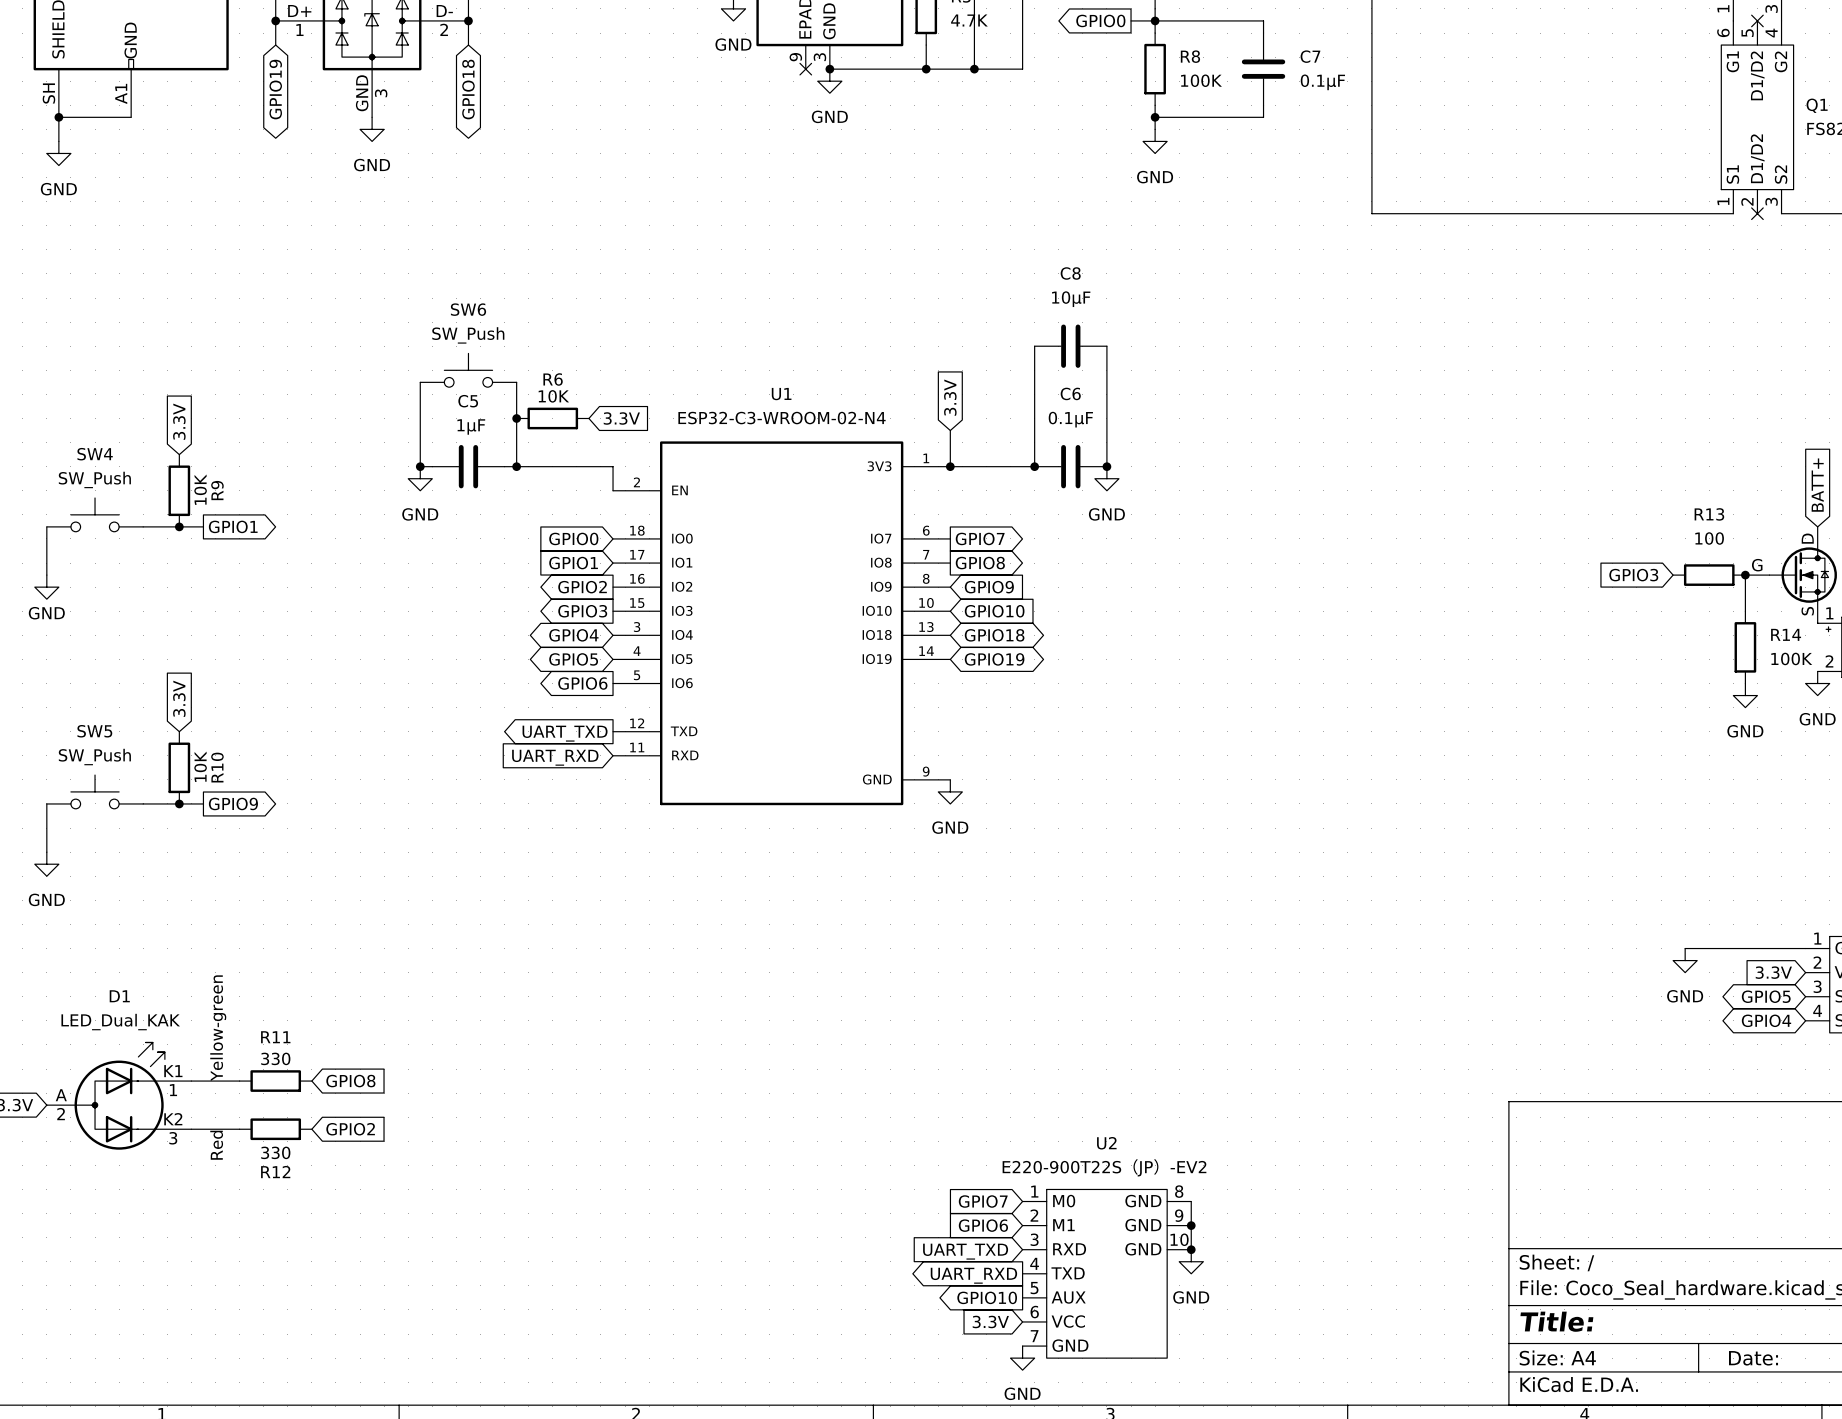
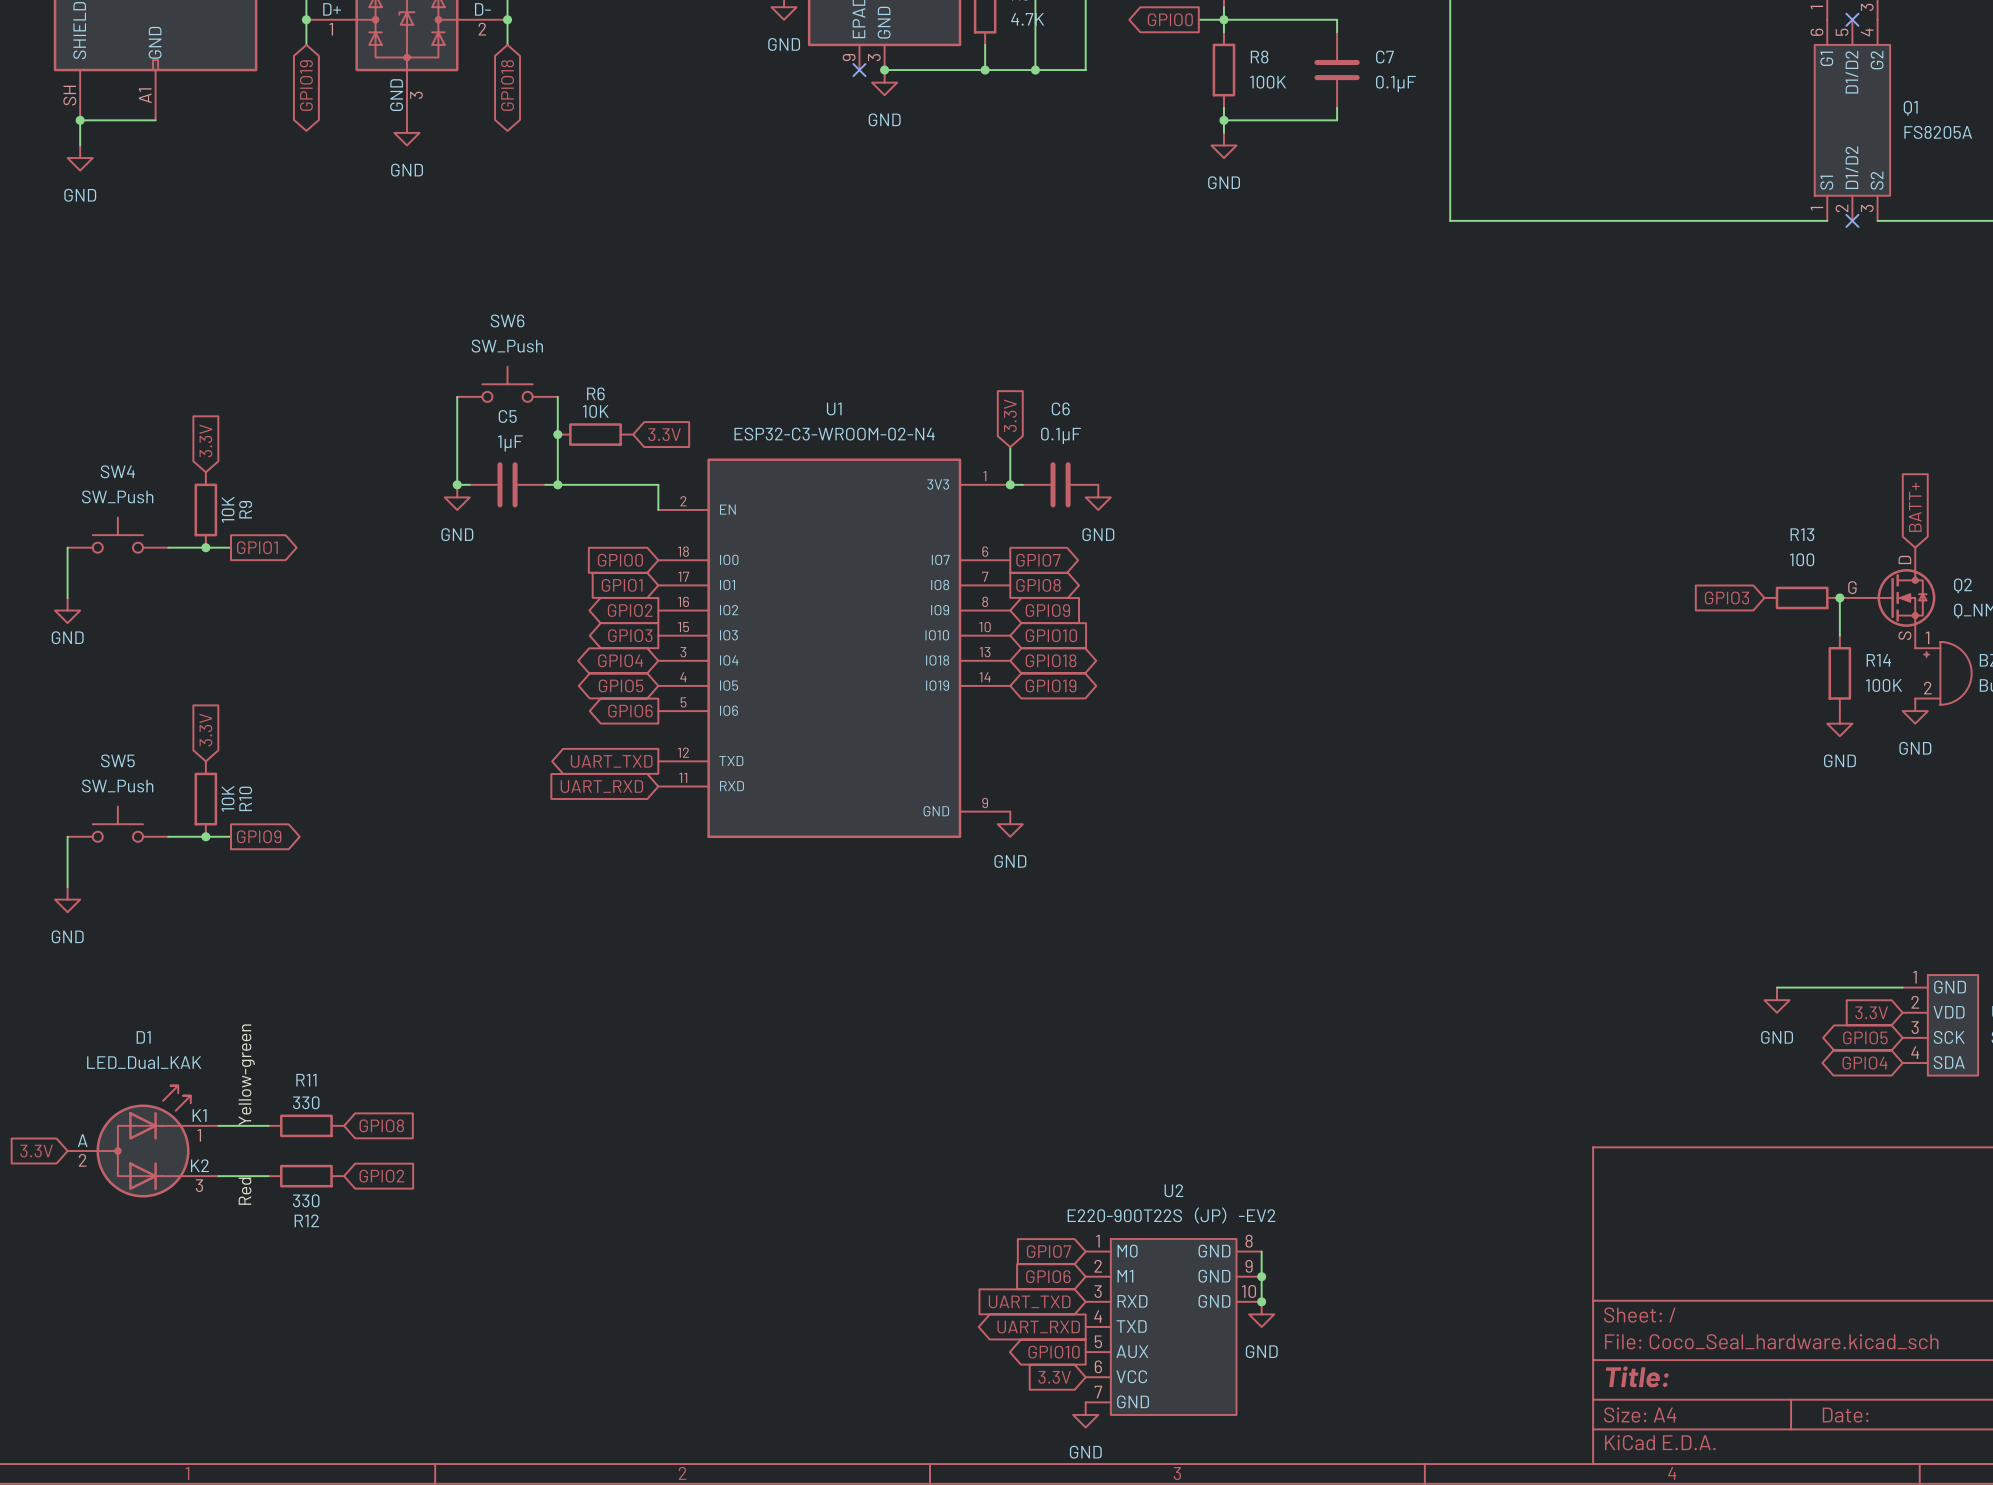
wire: (1034, 346) (1034, 466) (962, 466) -> none
C8: 10μF (1070, 346) -> none
wire: (1106, 346) (1106, 466) -> none
junction: (1034, 466) -> none
C6 position: (1070, 466) -> (1060, 484)
junction: (1106, 466) -> none
power symbol position: GND (1106, 478) -> GND (1098, 497)

